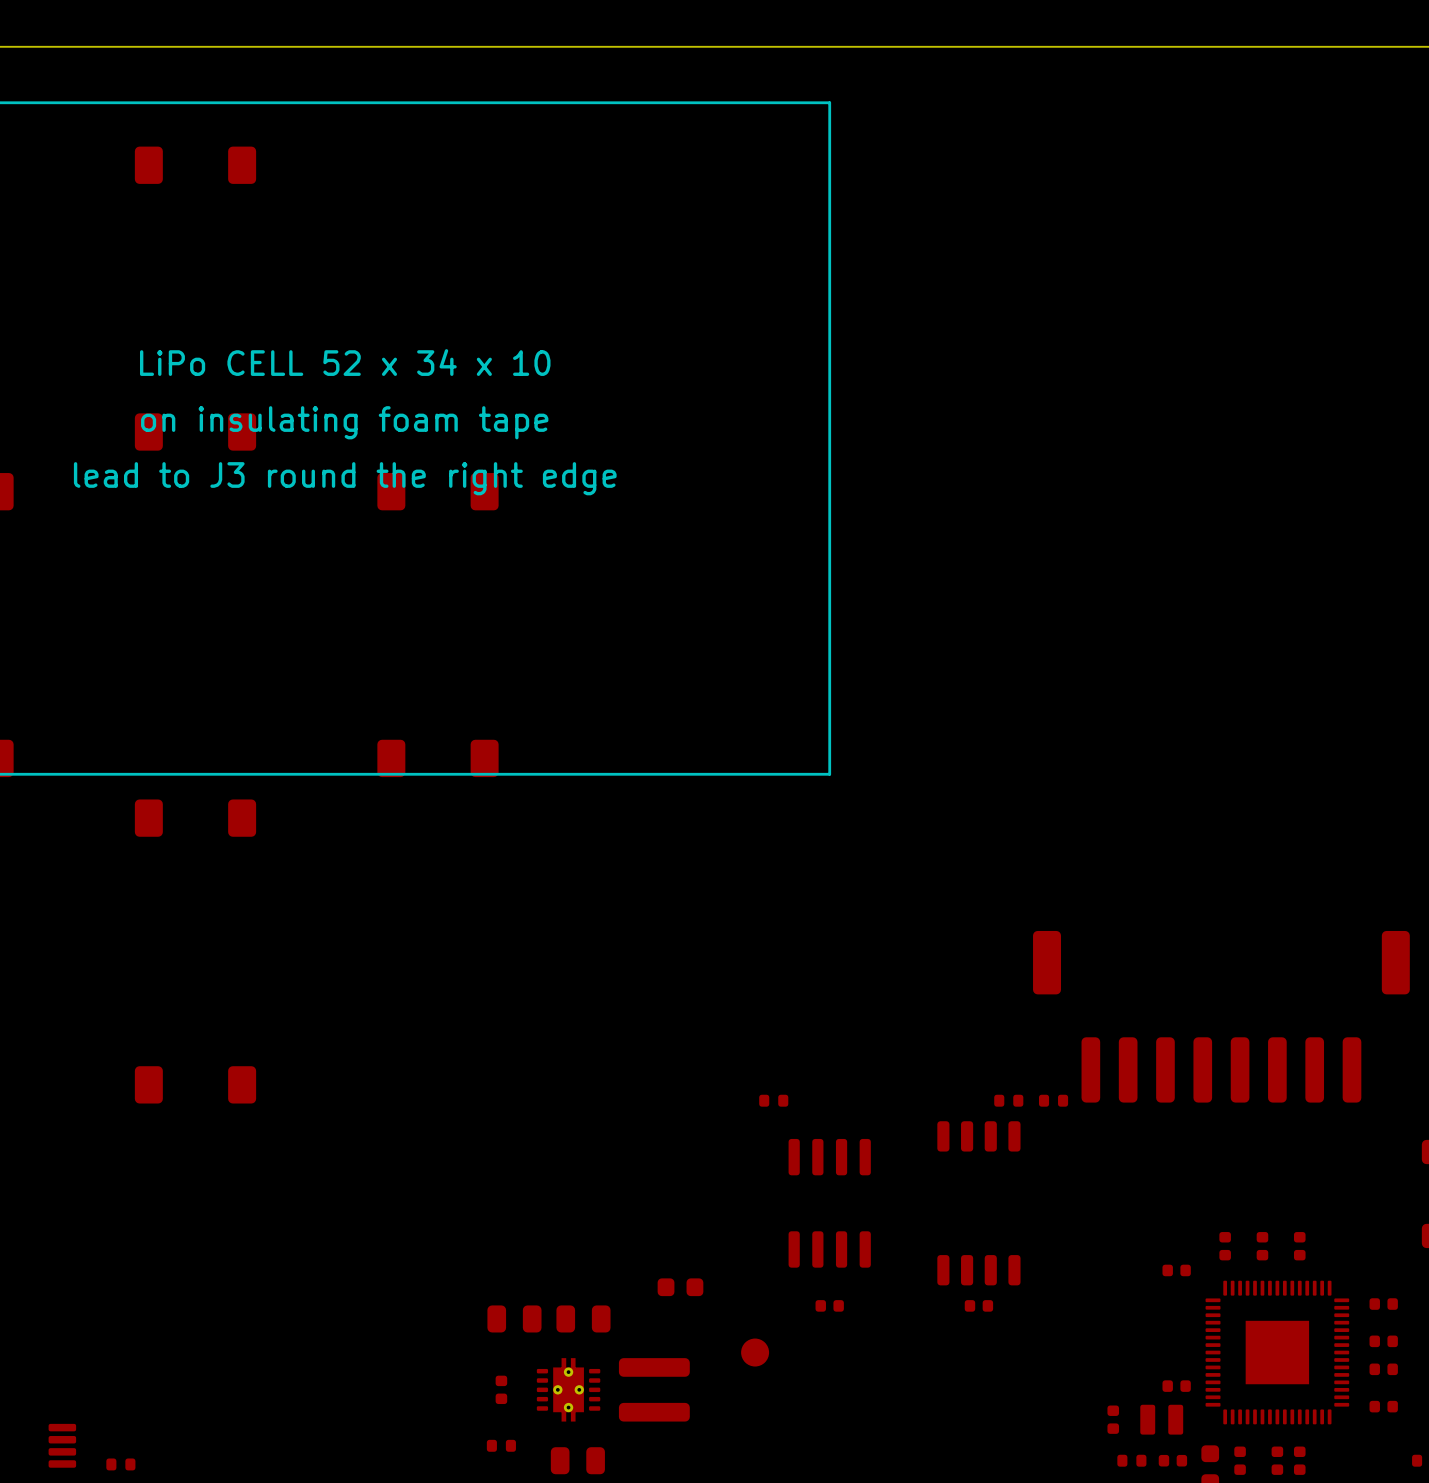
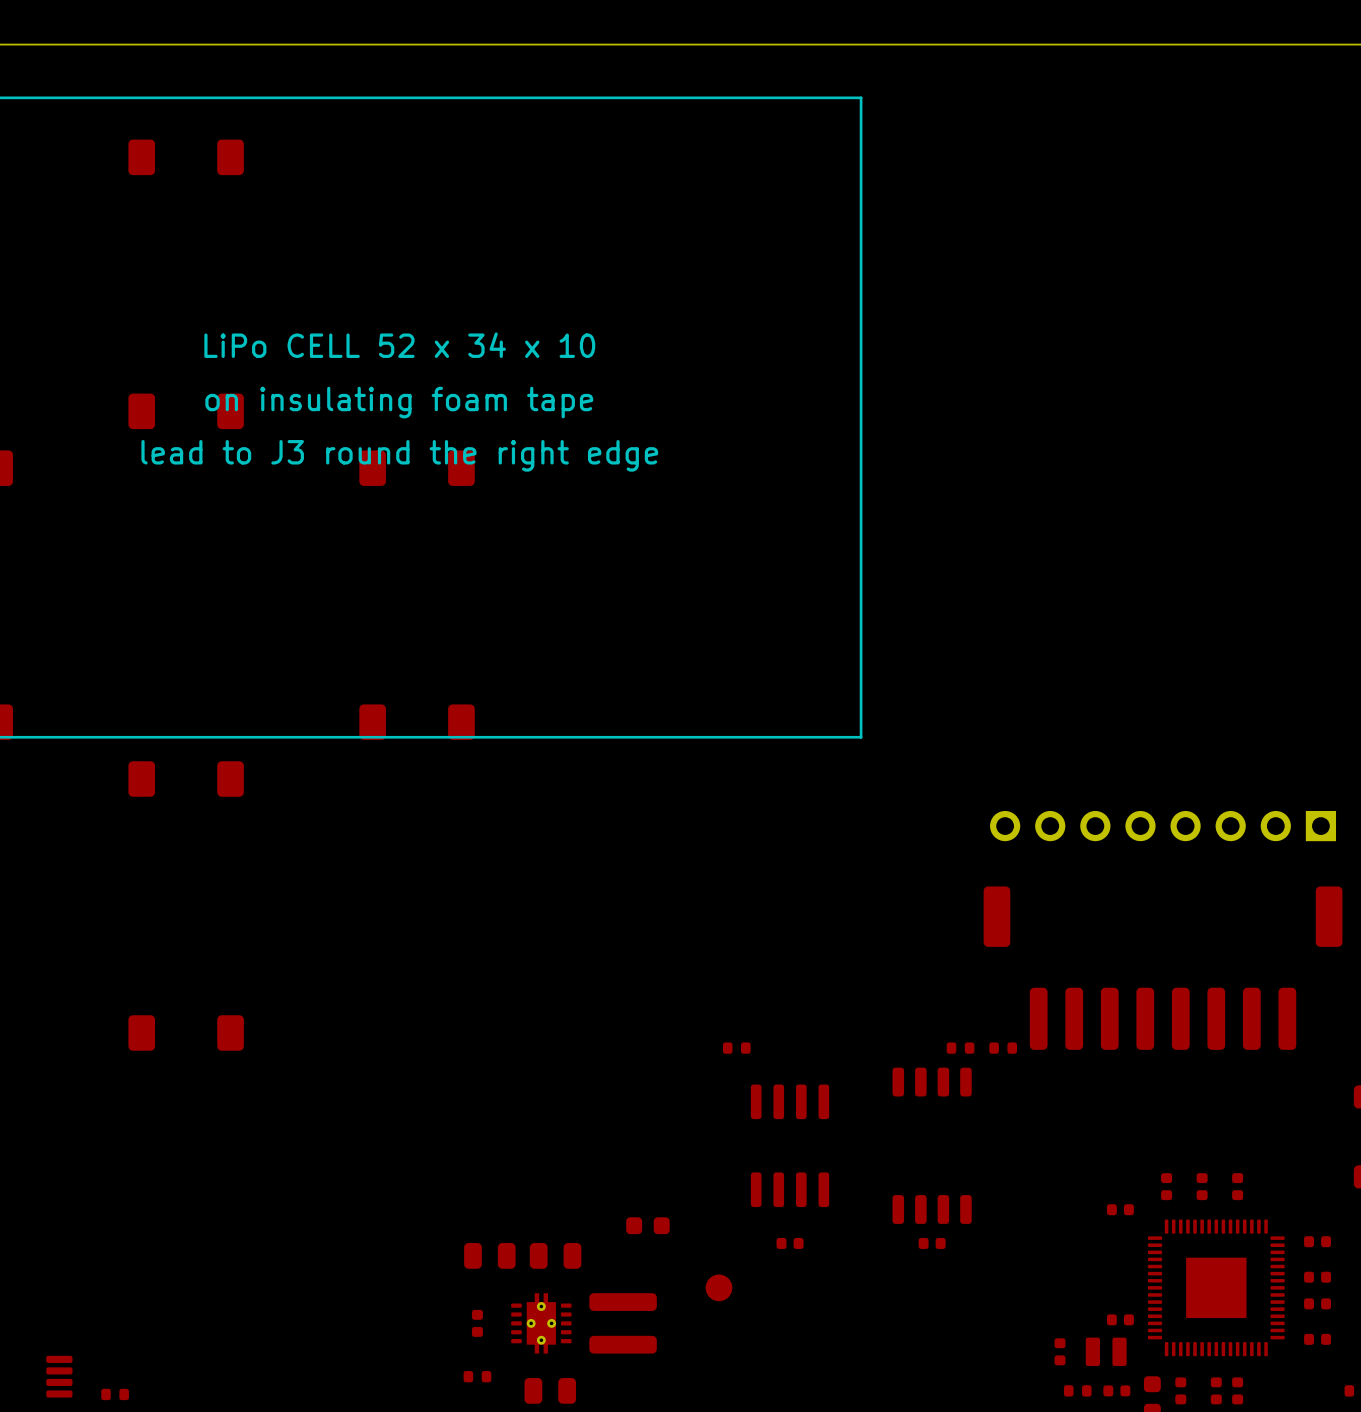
line: (829, 102) (829, 774) -> (790, 97) (861, 97) (861, 737) (790, 737)
text position: LiPo CELL 52 x 34 x 10 (345, 362) -> LiPo CELL 52 x 34 x 10 (399, 345)
text position: on insulating foam tape (344, 422) -> on insulating foam tape (399, 402)
text position: lead to J3 round the right edge (345, 478) -> lead to J3 round the right edge (399, 455)
part: none -> (1163, 826)

